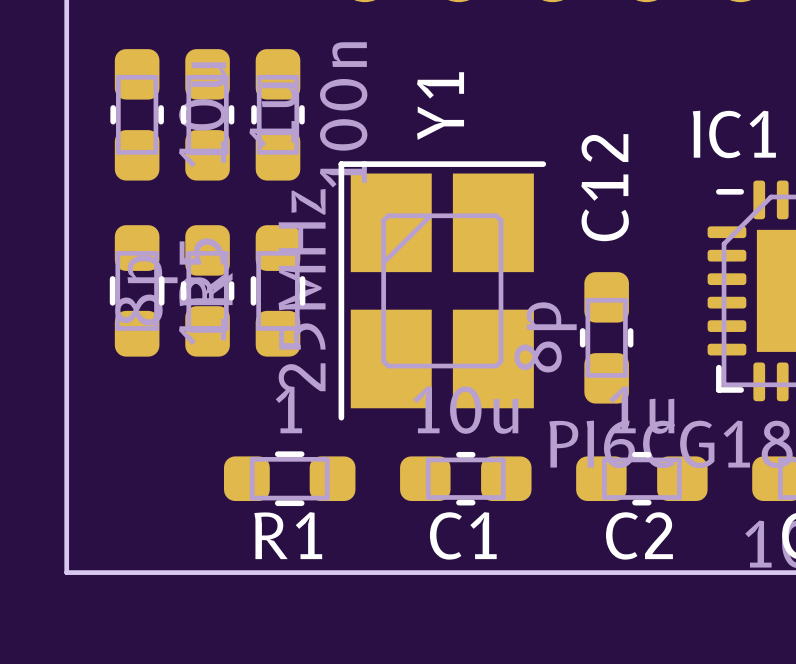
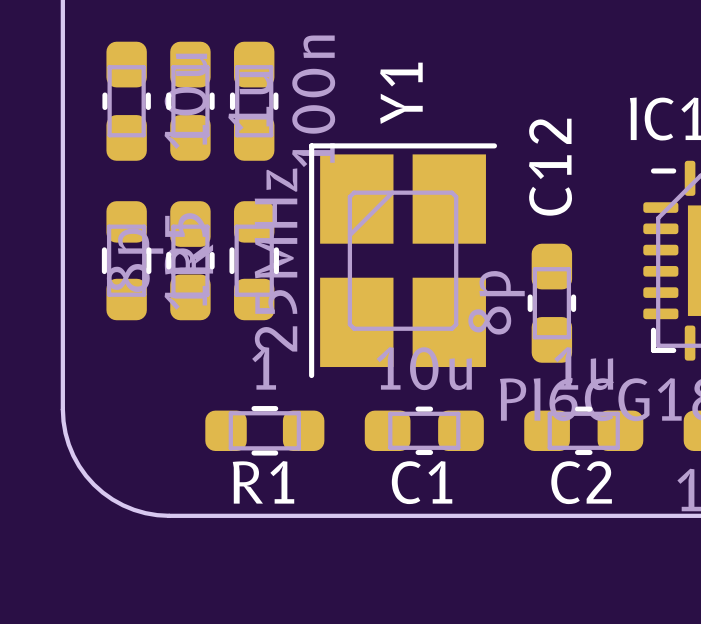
board edge: (66, 455) (66, 572) (184, 572) -> (62, 409) (65, 433) (73, 455) (93, 484) (123, 505) (145, 513) (169, 515)

